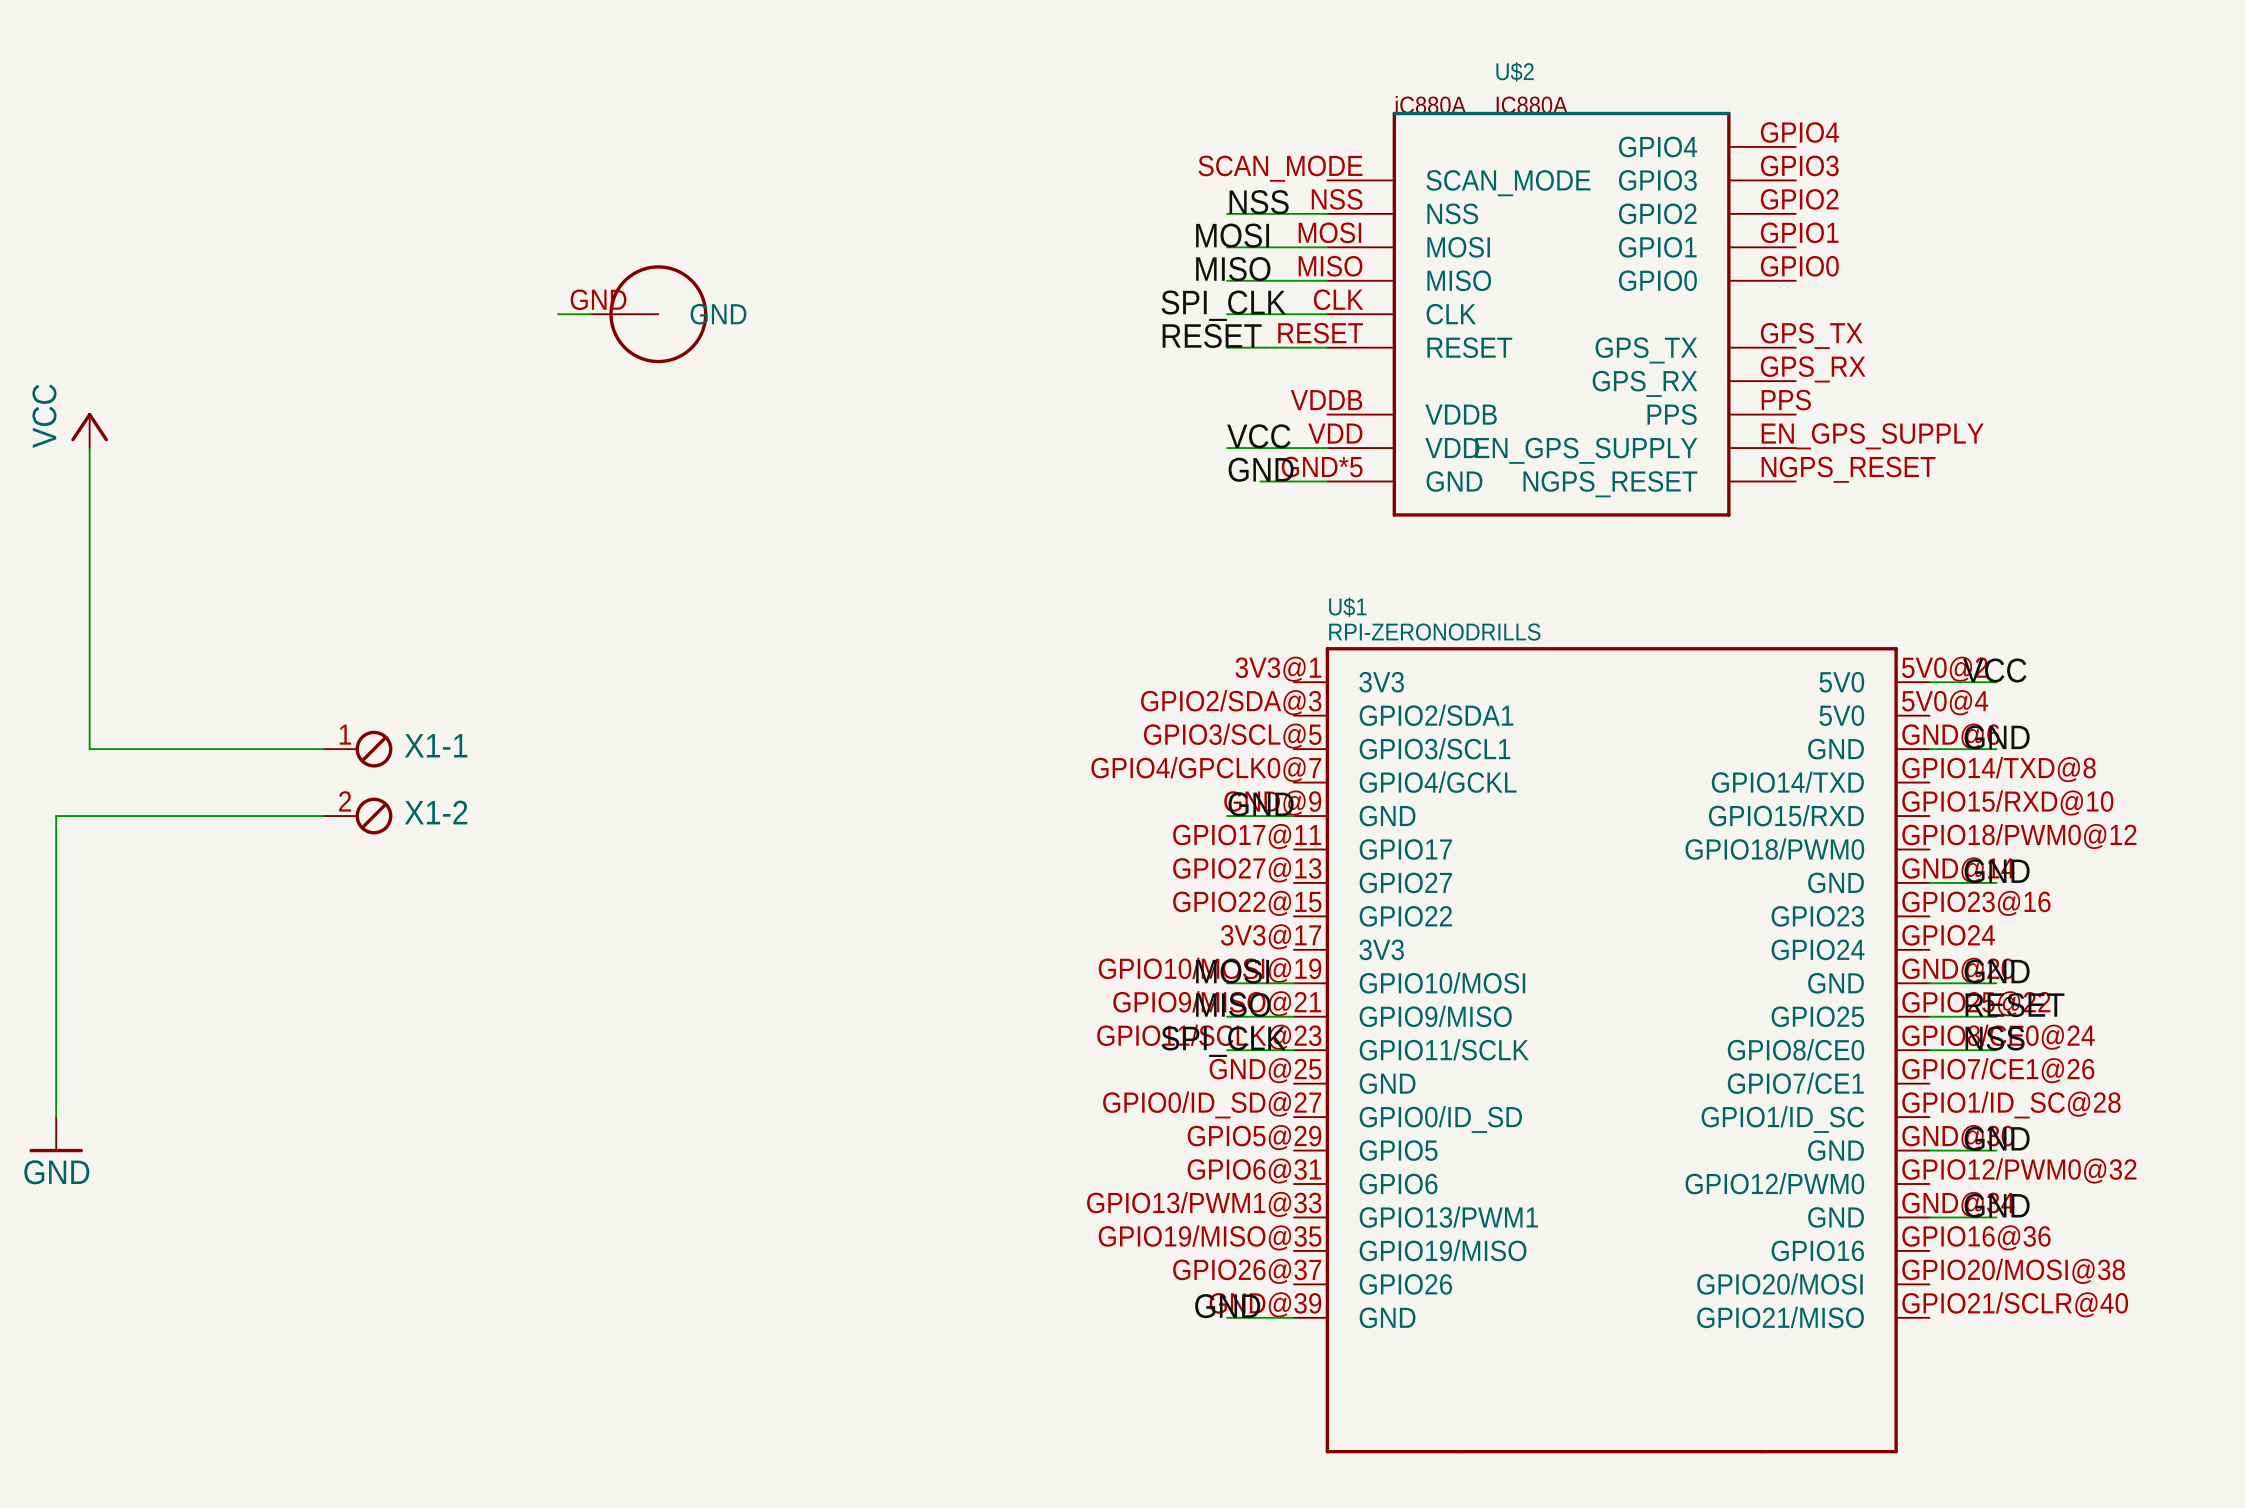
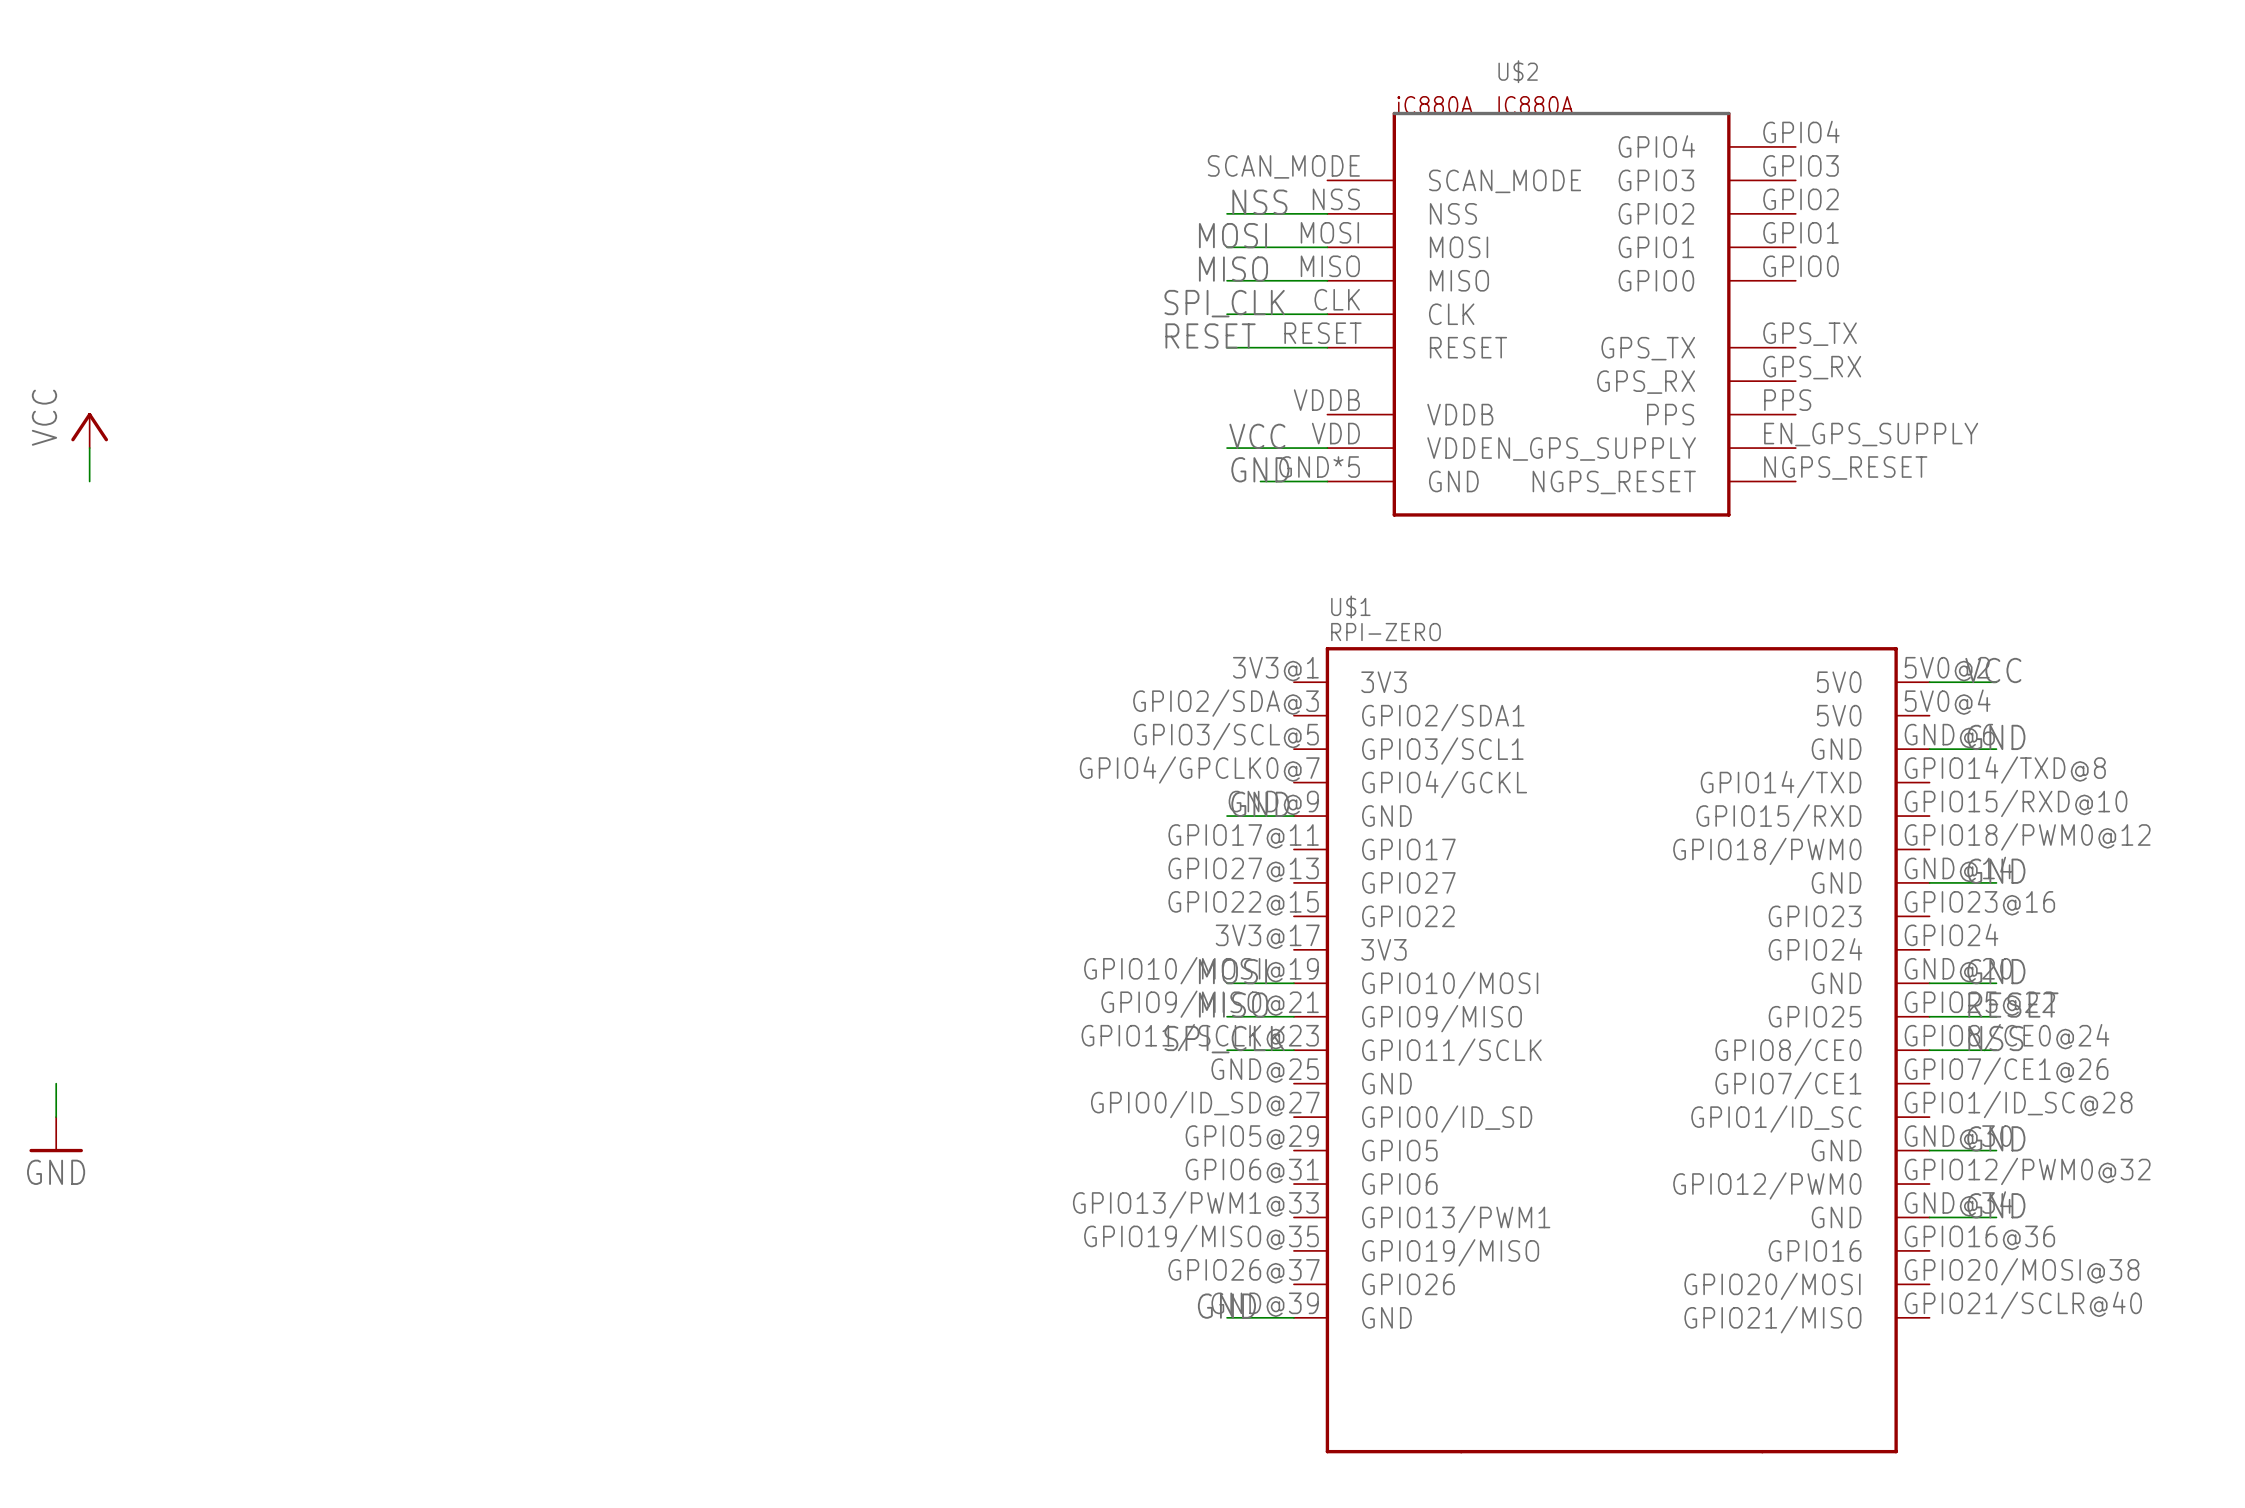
wire: (557, 314) (591, 314) -> none
part: (649, 314) -> none
wire: (89, 481) (89, 749) (323, 749) -> none
U$1 value: RPI-ZERONODRILLS (1434, 632) -> RPI-ZERO (1385, 632)
X1-1: (358, 749) -> none
wire: (323, 816) (56, 816) (56, 1083) -> none
X1-2: (358, 816) -> none

